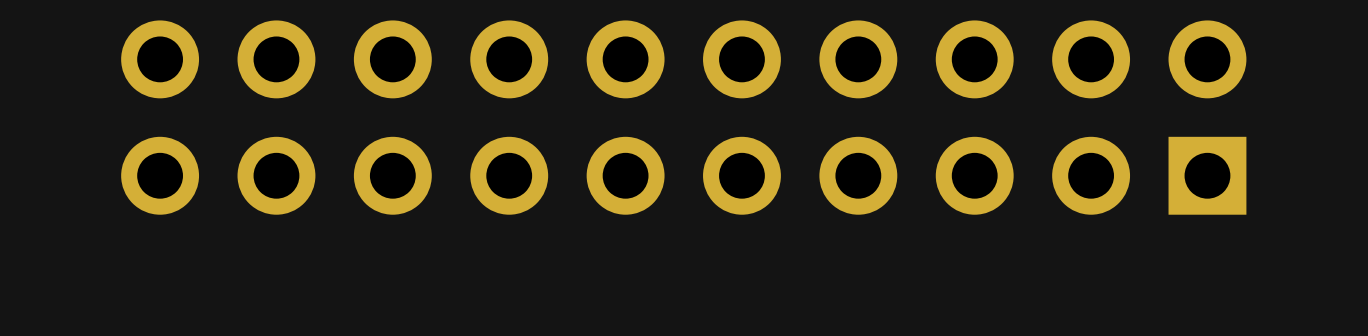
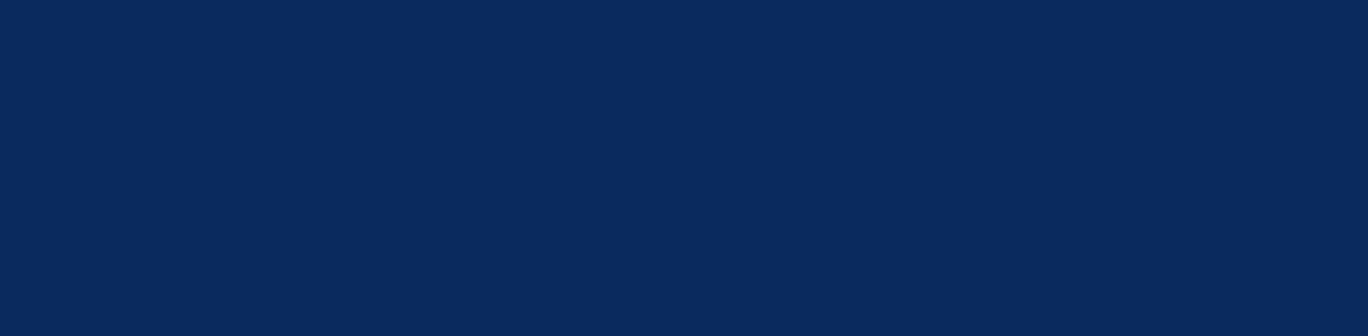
part: (683, 117) -> none

